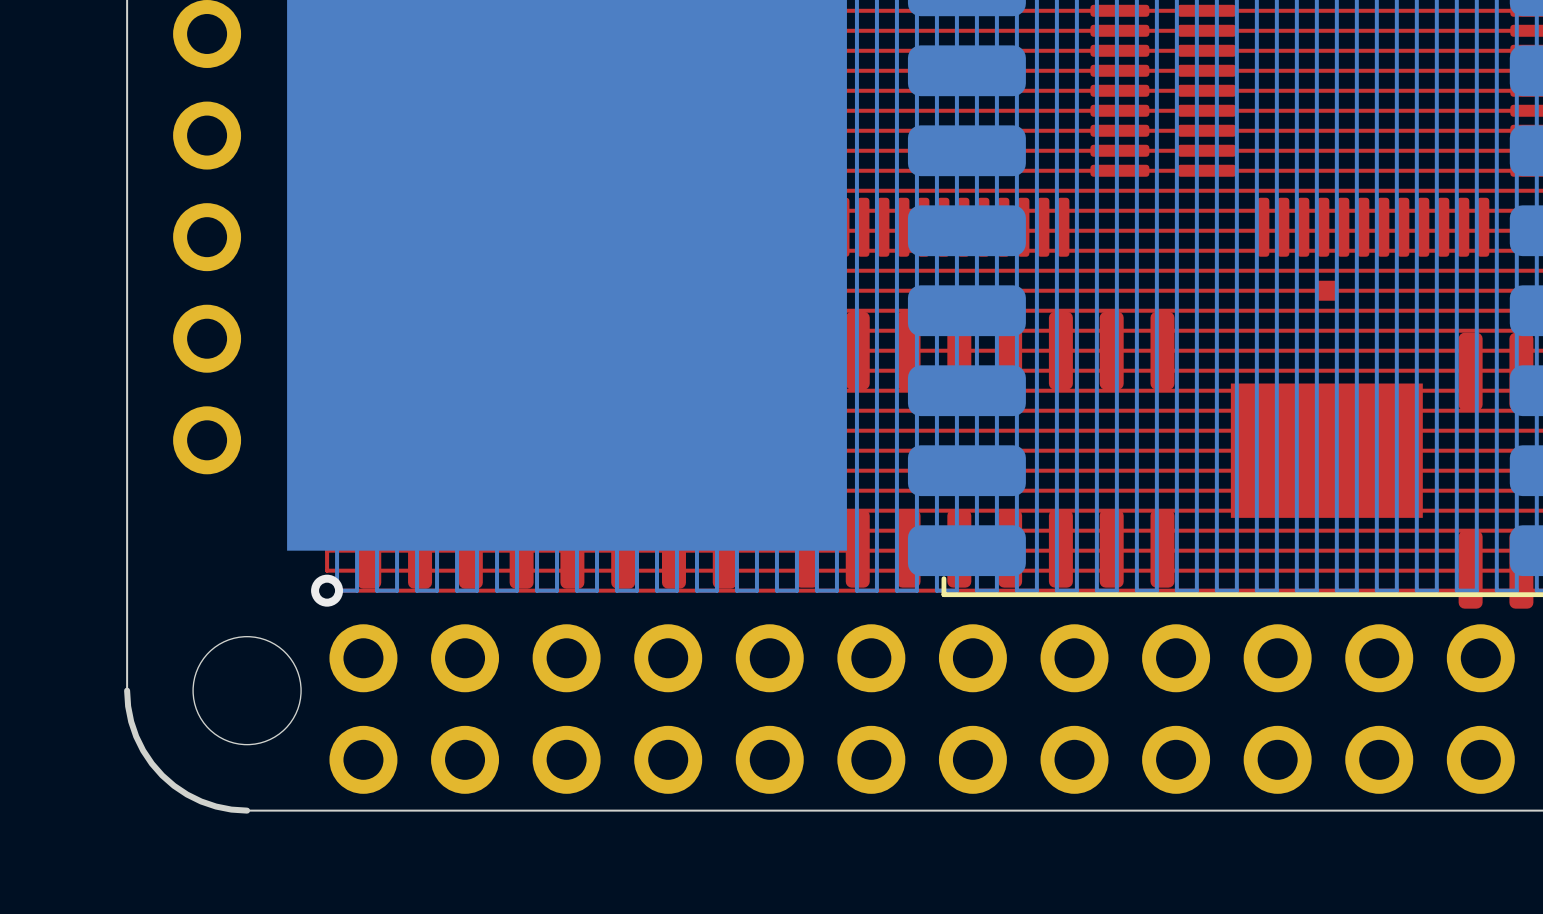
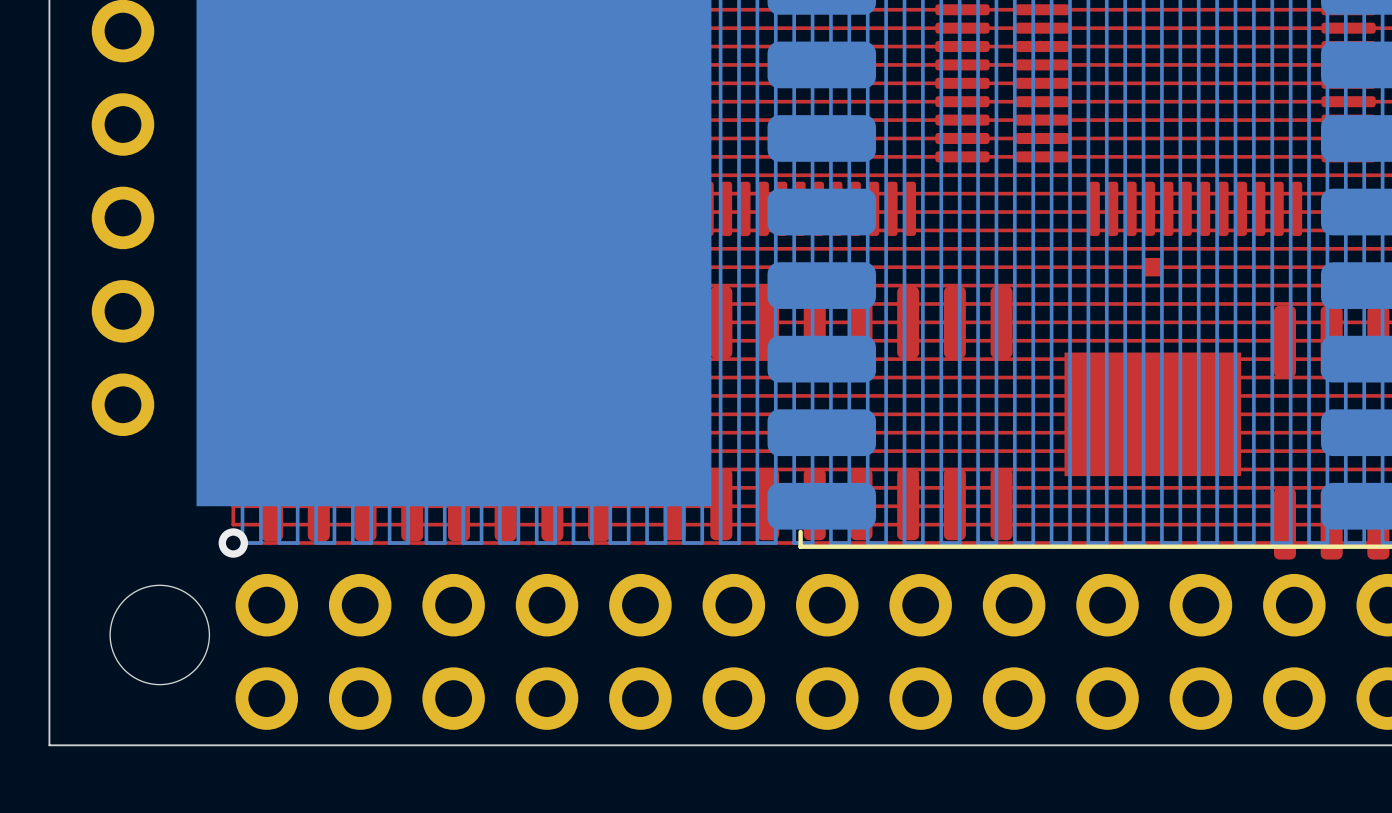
board edge: (127, 690) (128, 706) (136, 736) (151, 763) (162, 775) (174, 785) (201, 801) (216, 806) (247, 810) -> (49, 634) (49, 745) (159, 745)

